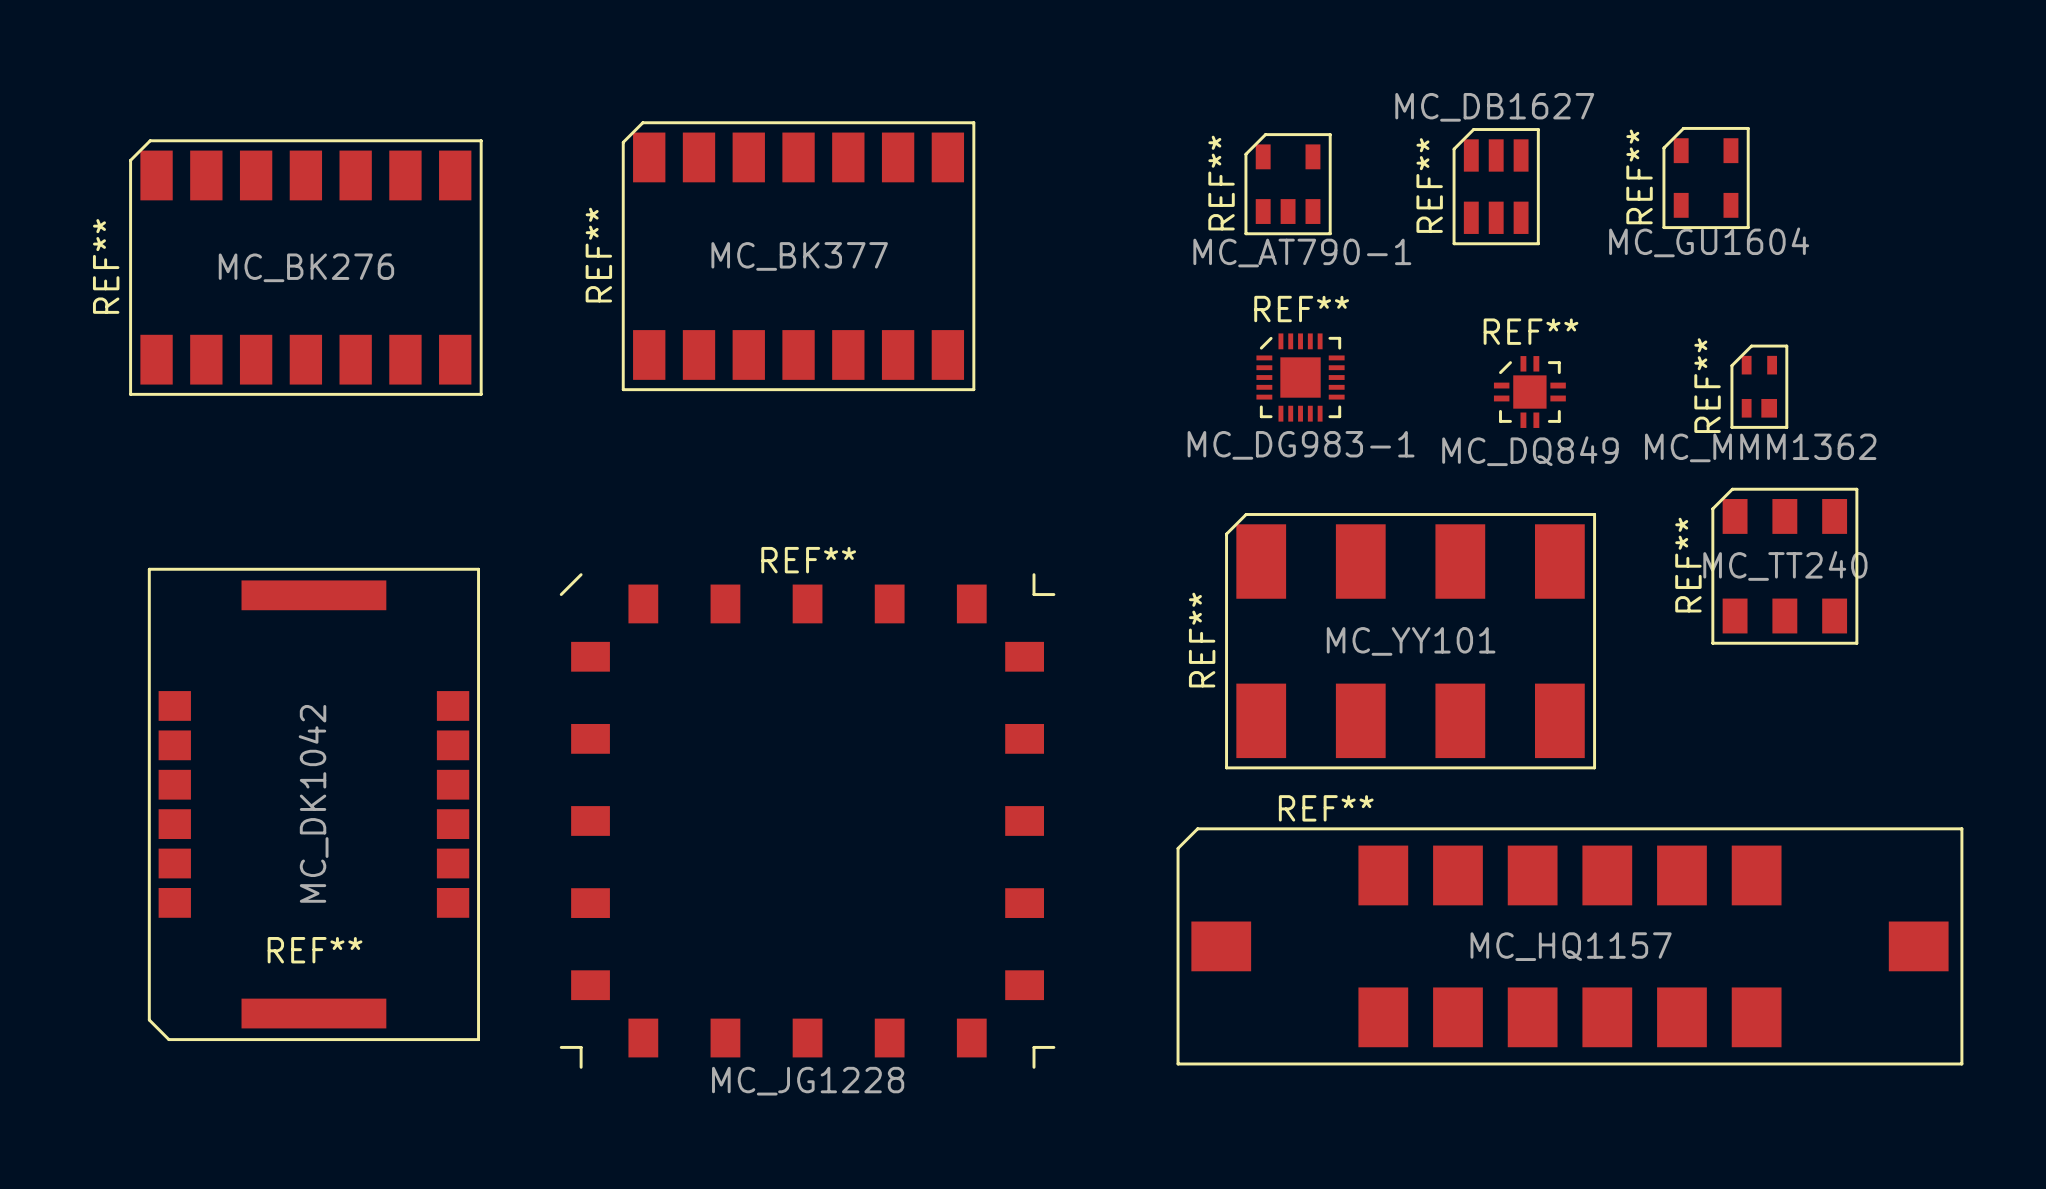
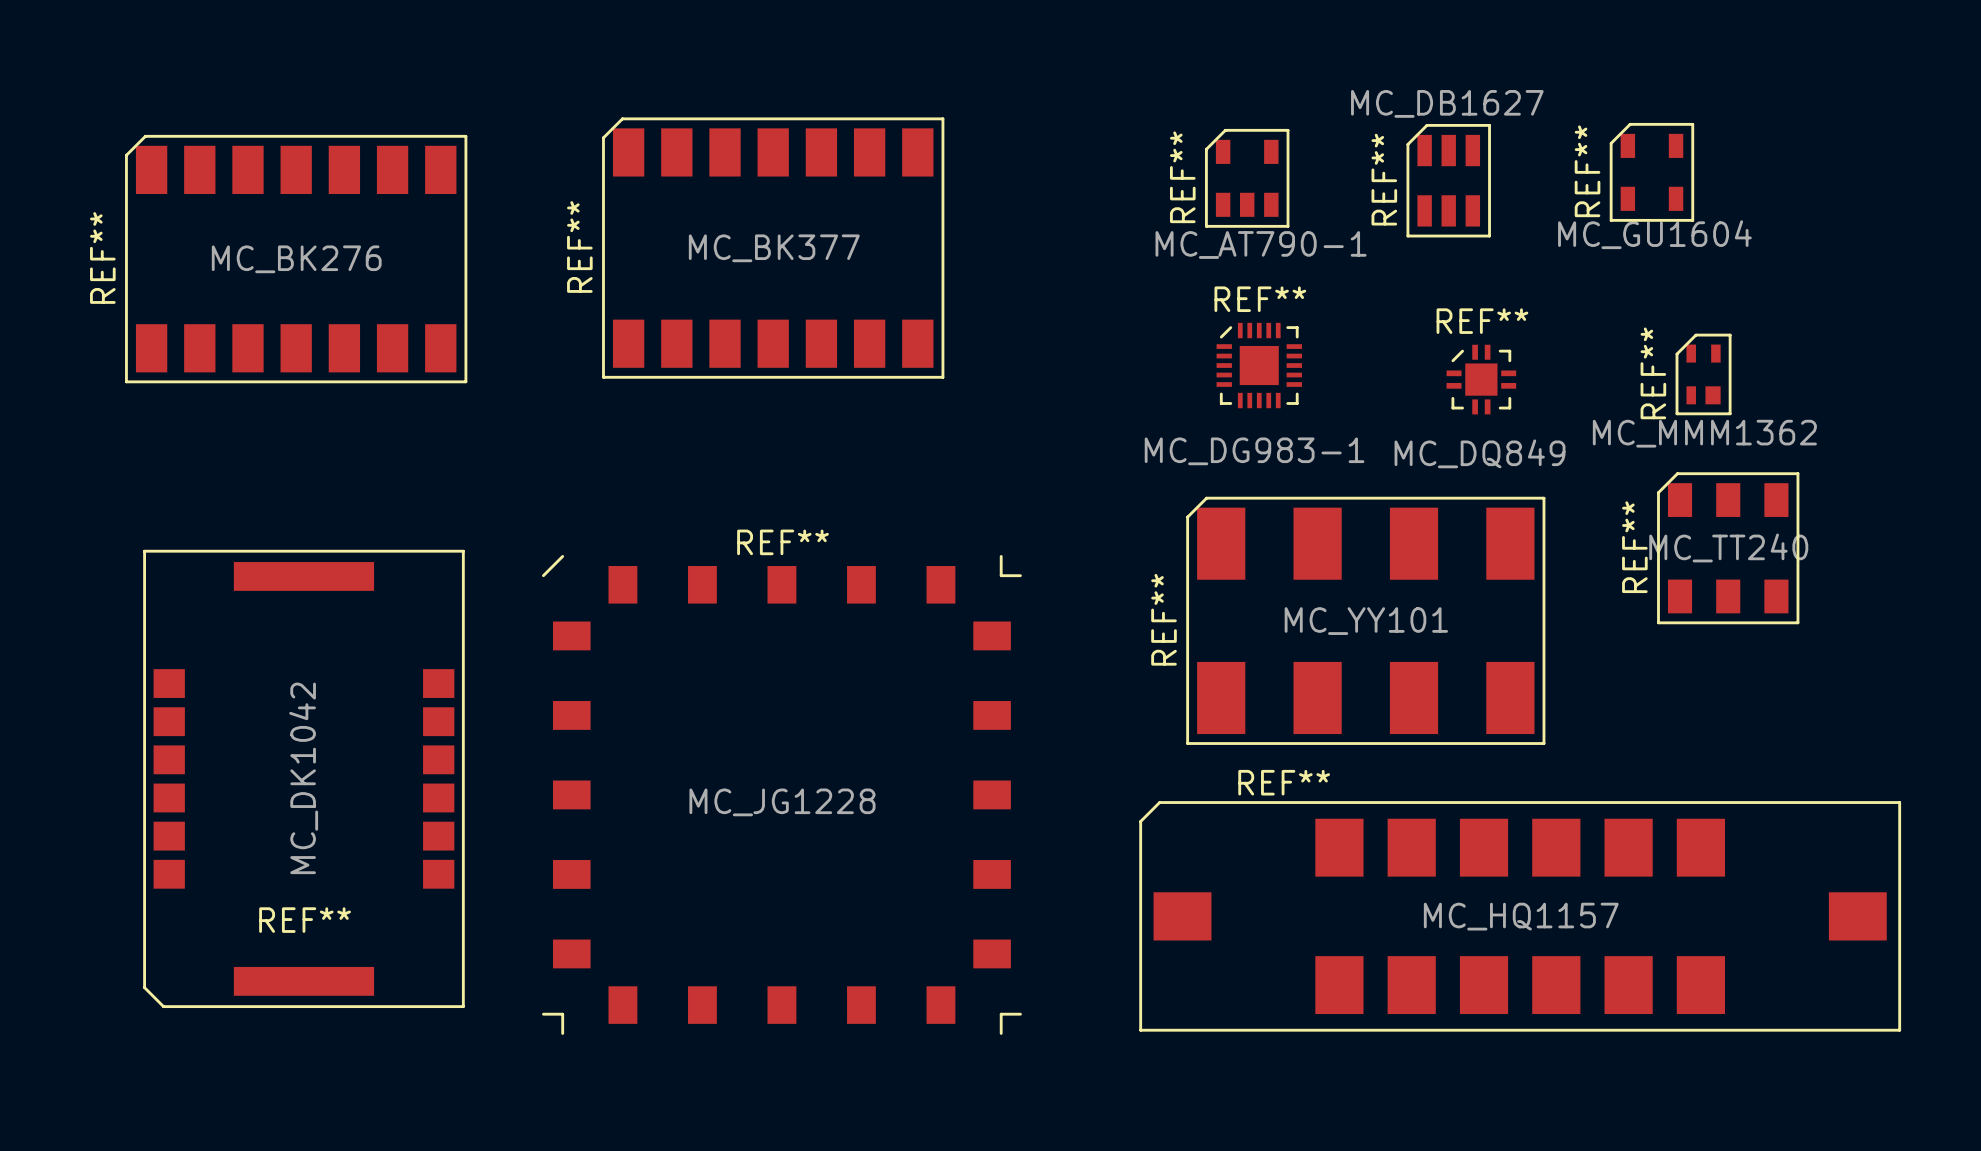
REF** value position: MC_DG983-1 (1301, 445) -> MC_DG983-1 (1254, 451)
REF** value position: MC_DQ849 (1530, 451) -> MC_DQ849 (1480, 453)
REF** value position: MC_JG1228 (808, 1081) -> MC_JG1228 (782, 802)

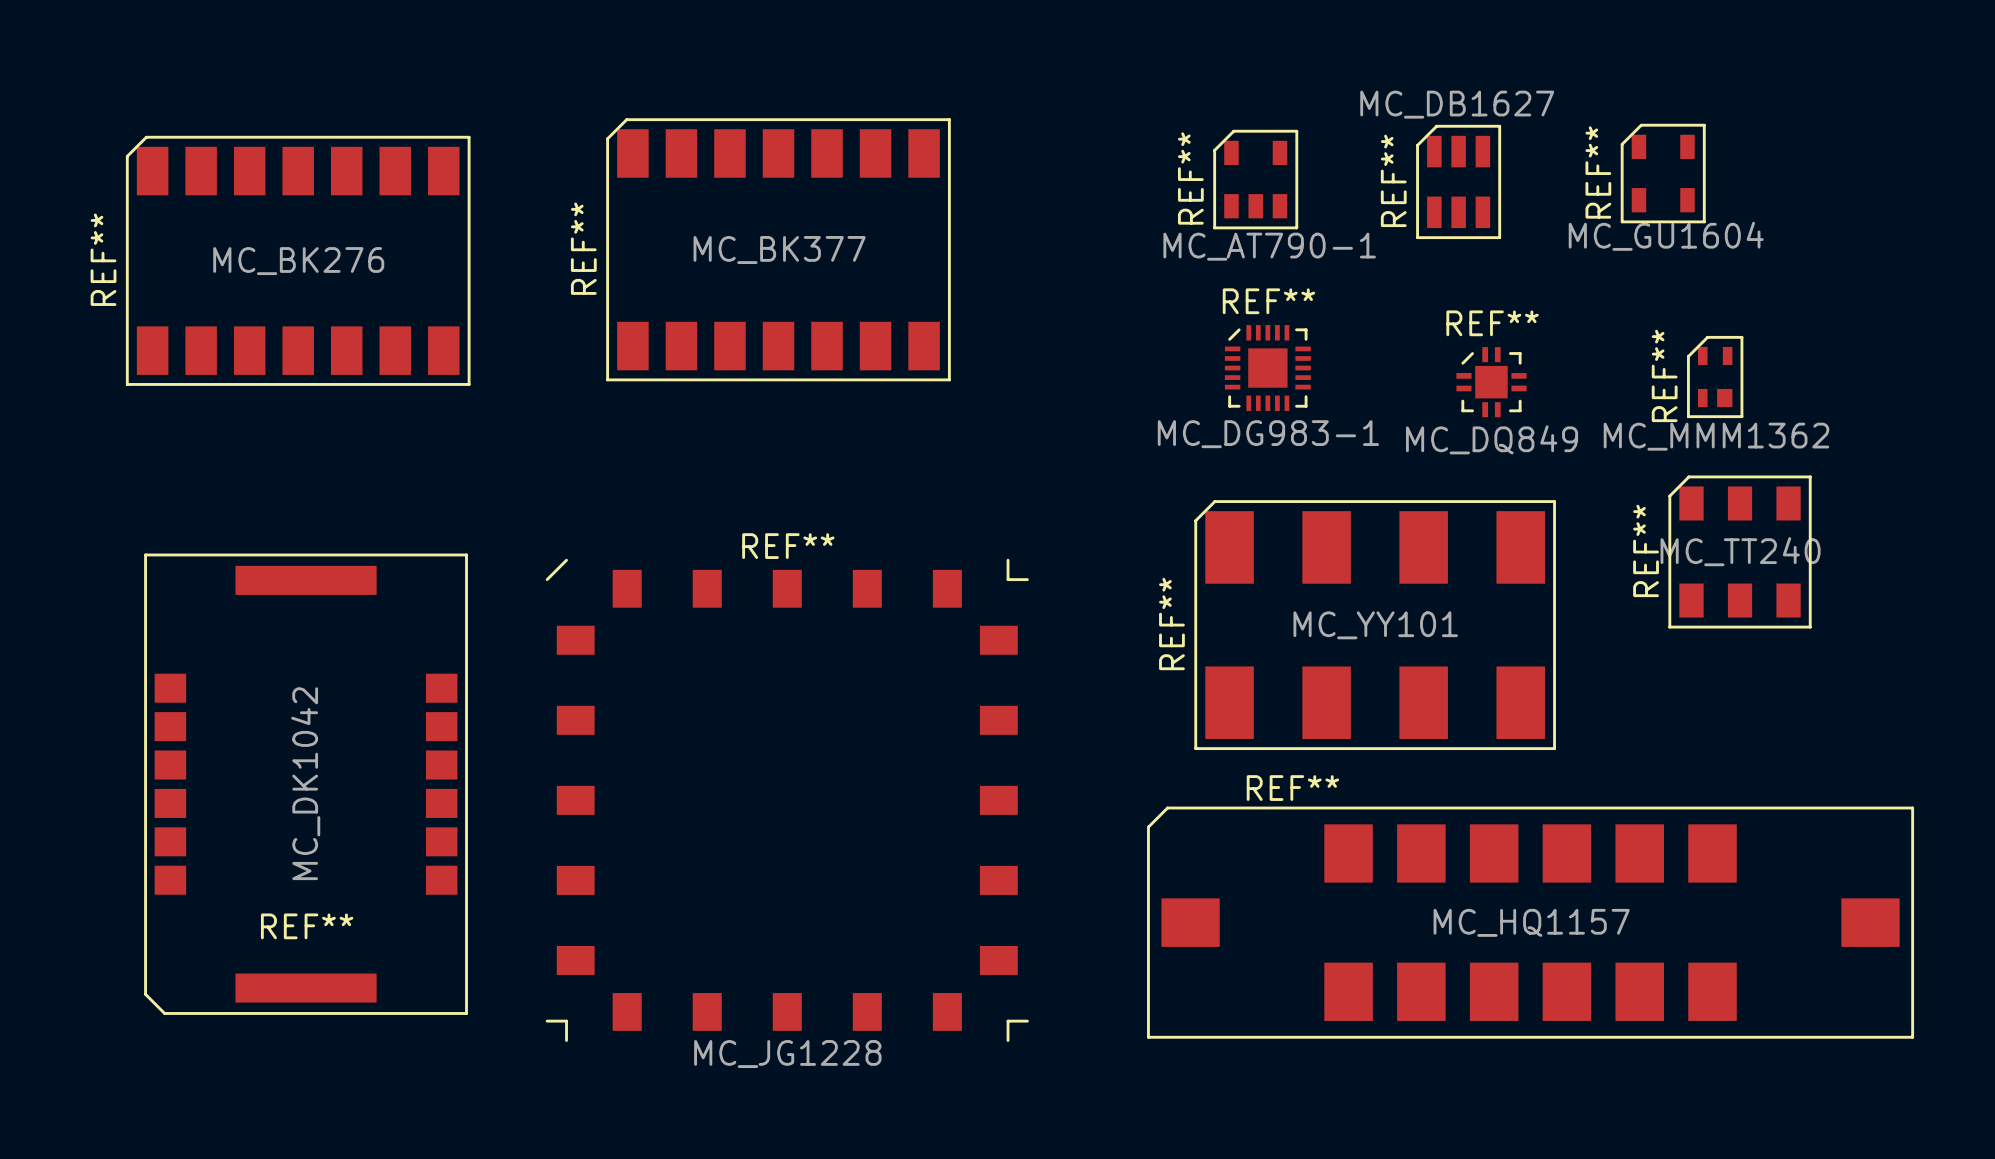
REF** value position: MC_DG983-1 (1254, 451) -> MC_DG983-1 (1268, 434)
REF** value position: MC_DQ849 (1480, 453) -> MC_DQ849 (1492, 439)
REF** value position: MC_JG1228 (782, 802) -> MC_JG1228 (787, 1054)

